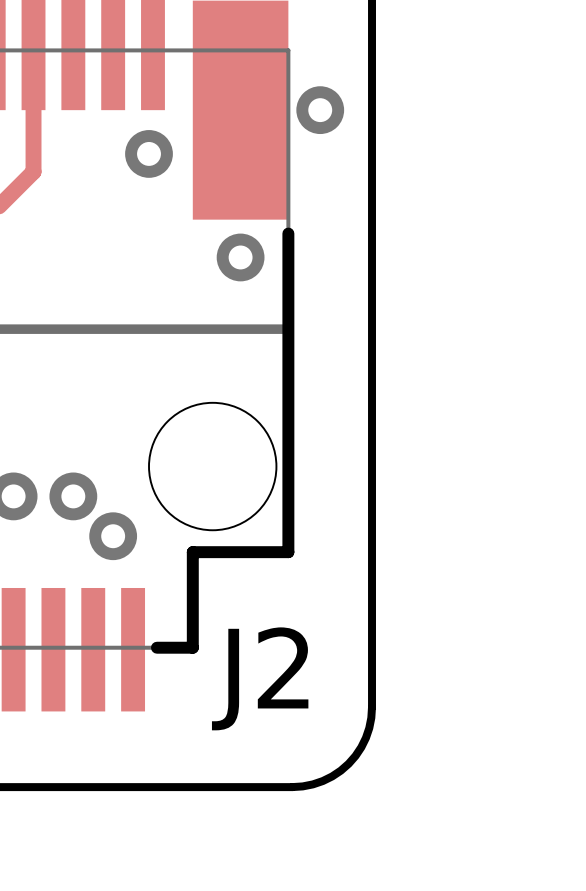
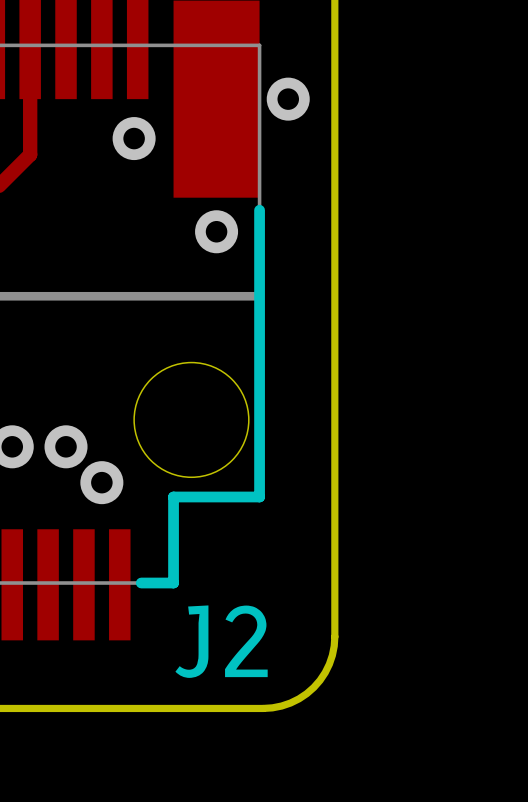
J2 name position: J2 (260, 678) -> J2 (221, 641)

